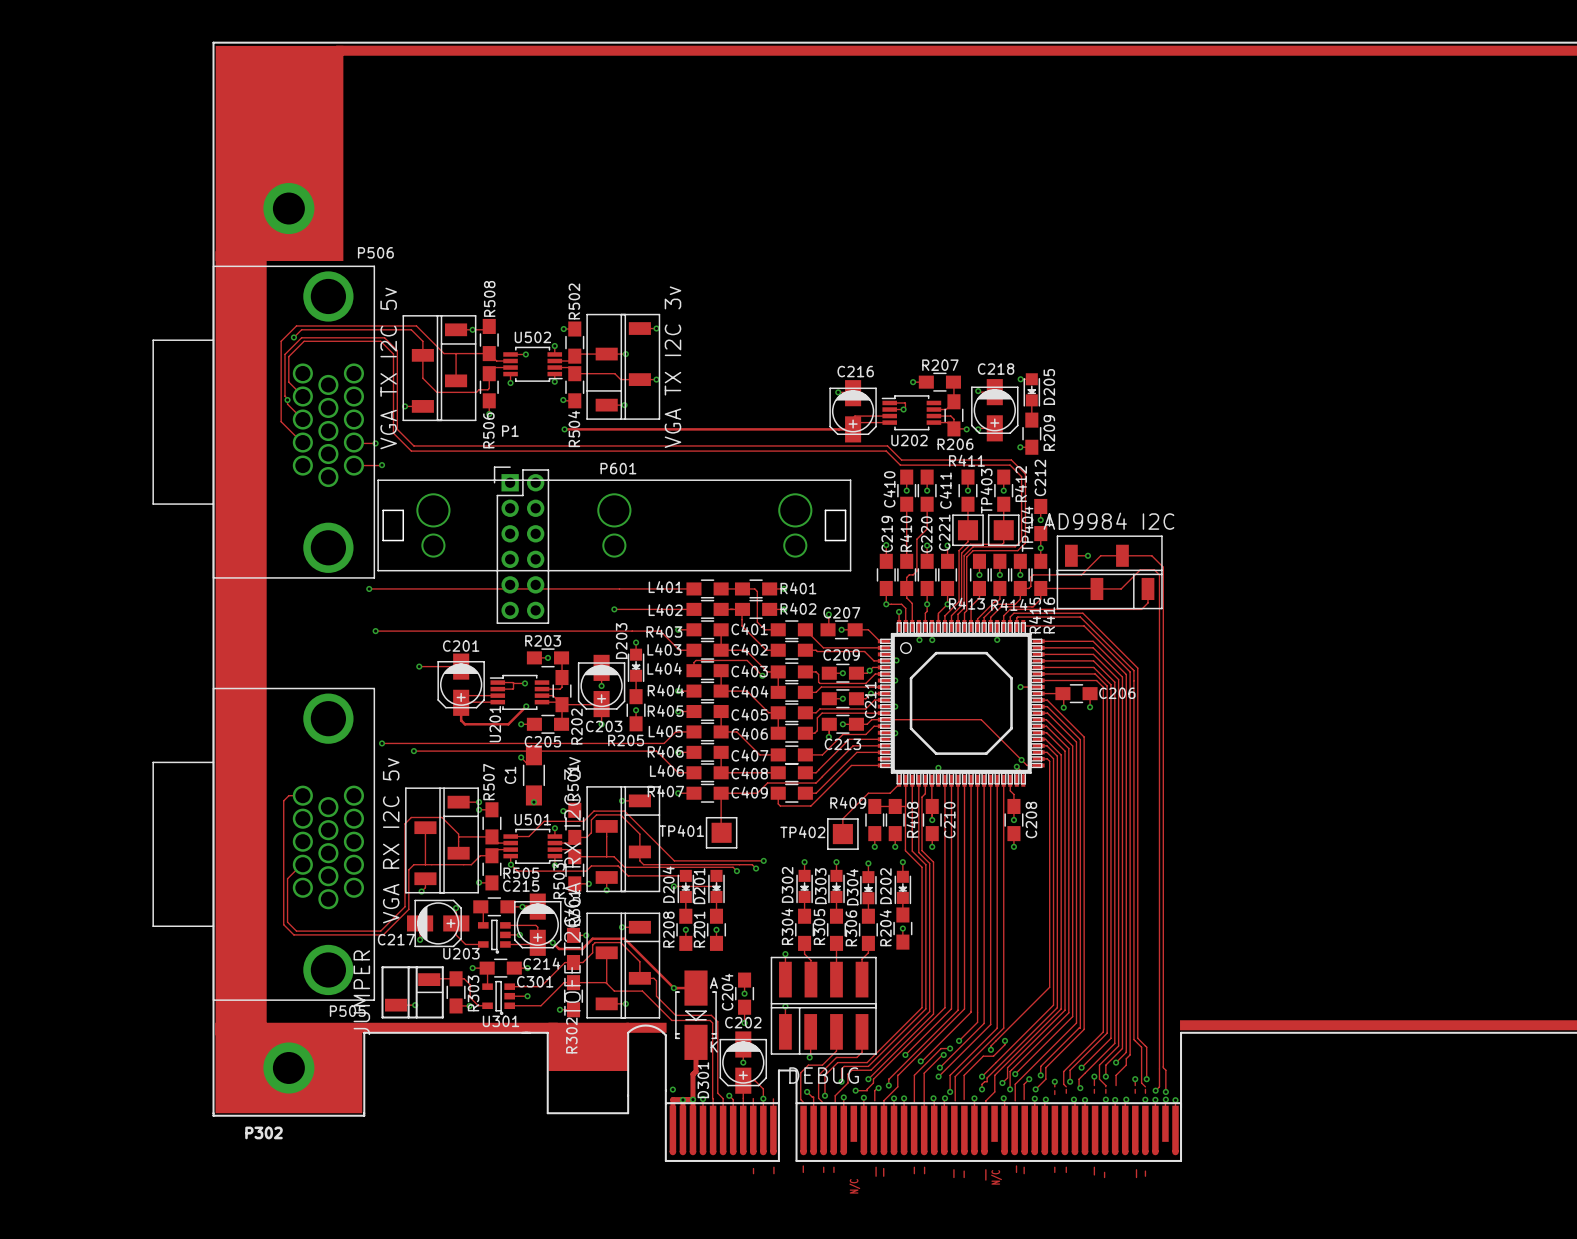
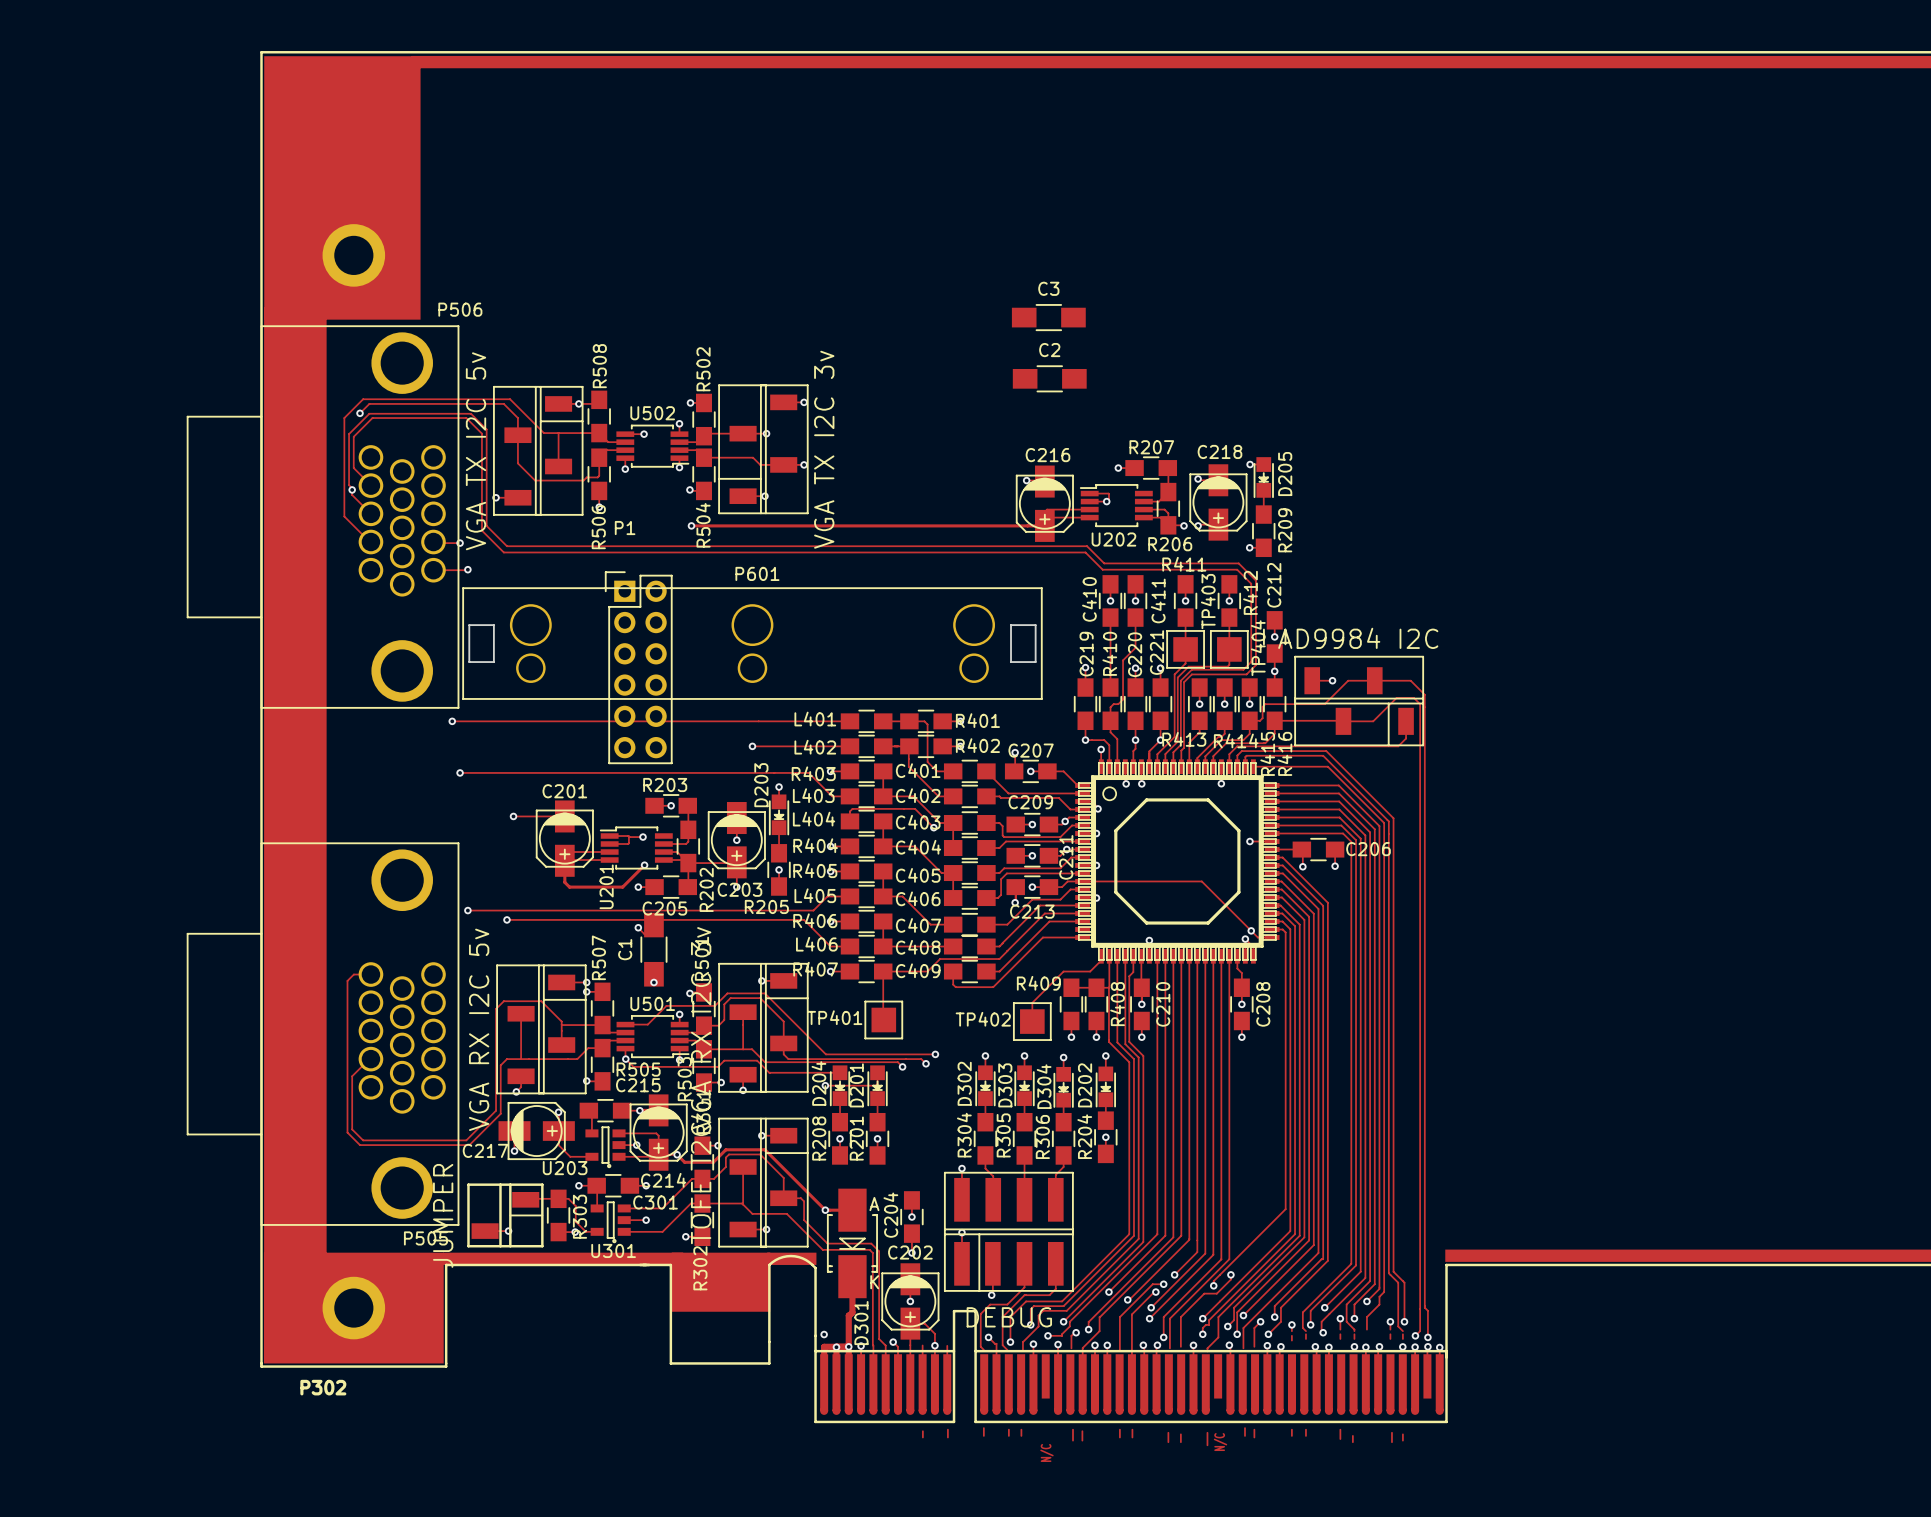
C3: none -> (1048, 317)
C2: none -> (1049, 378)

